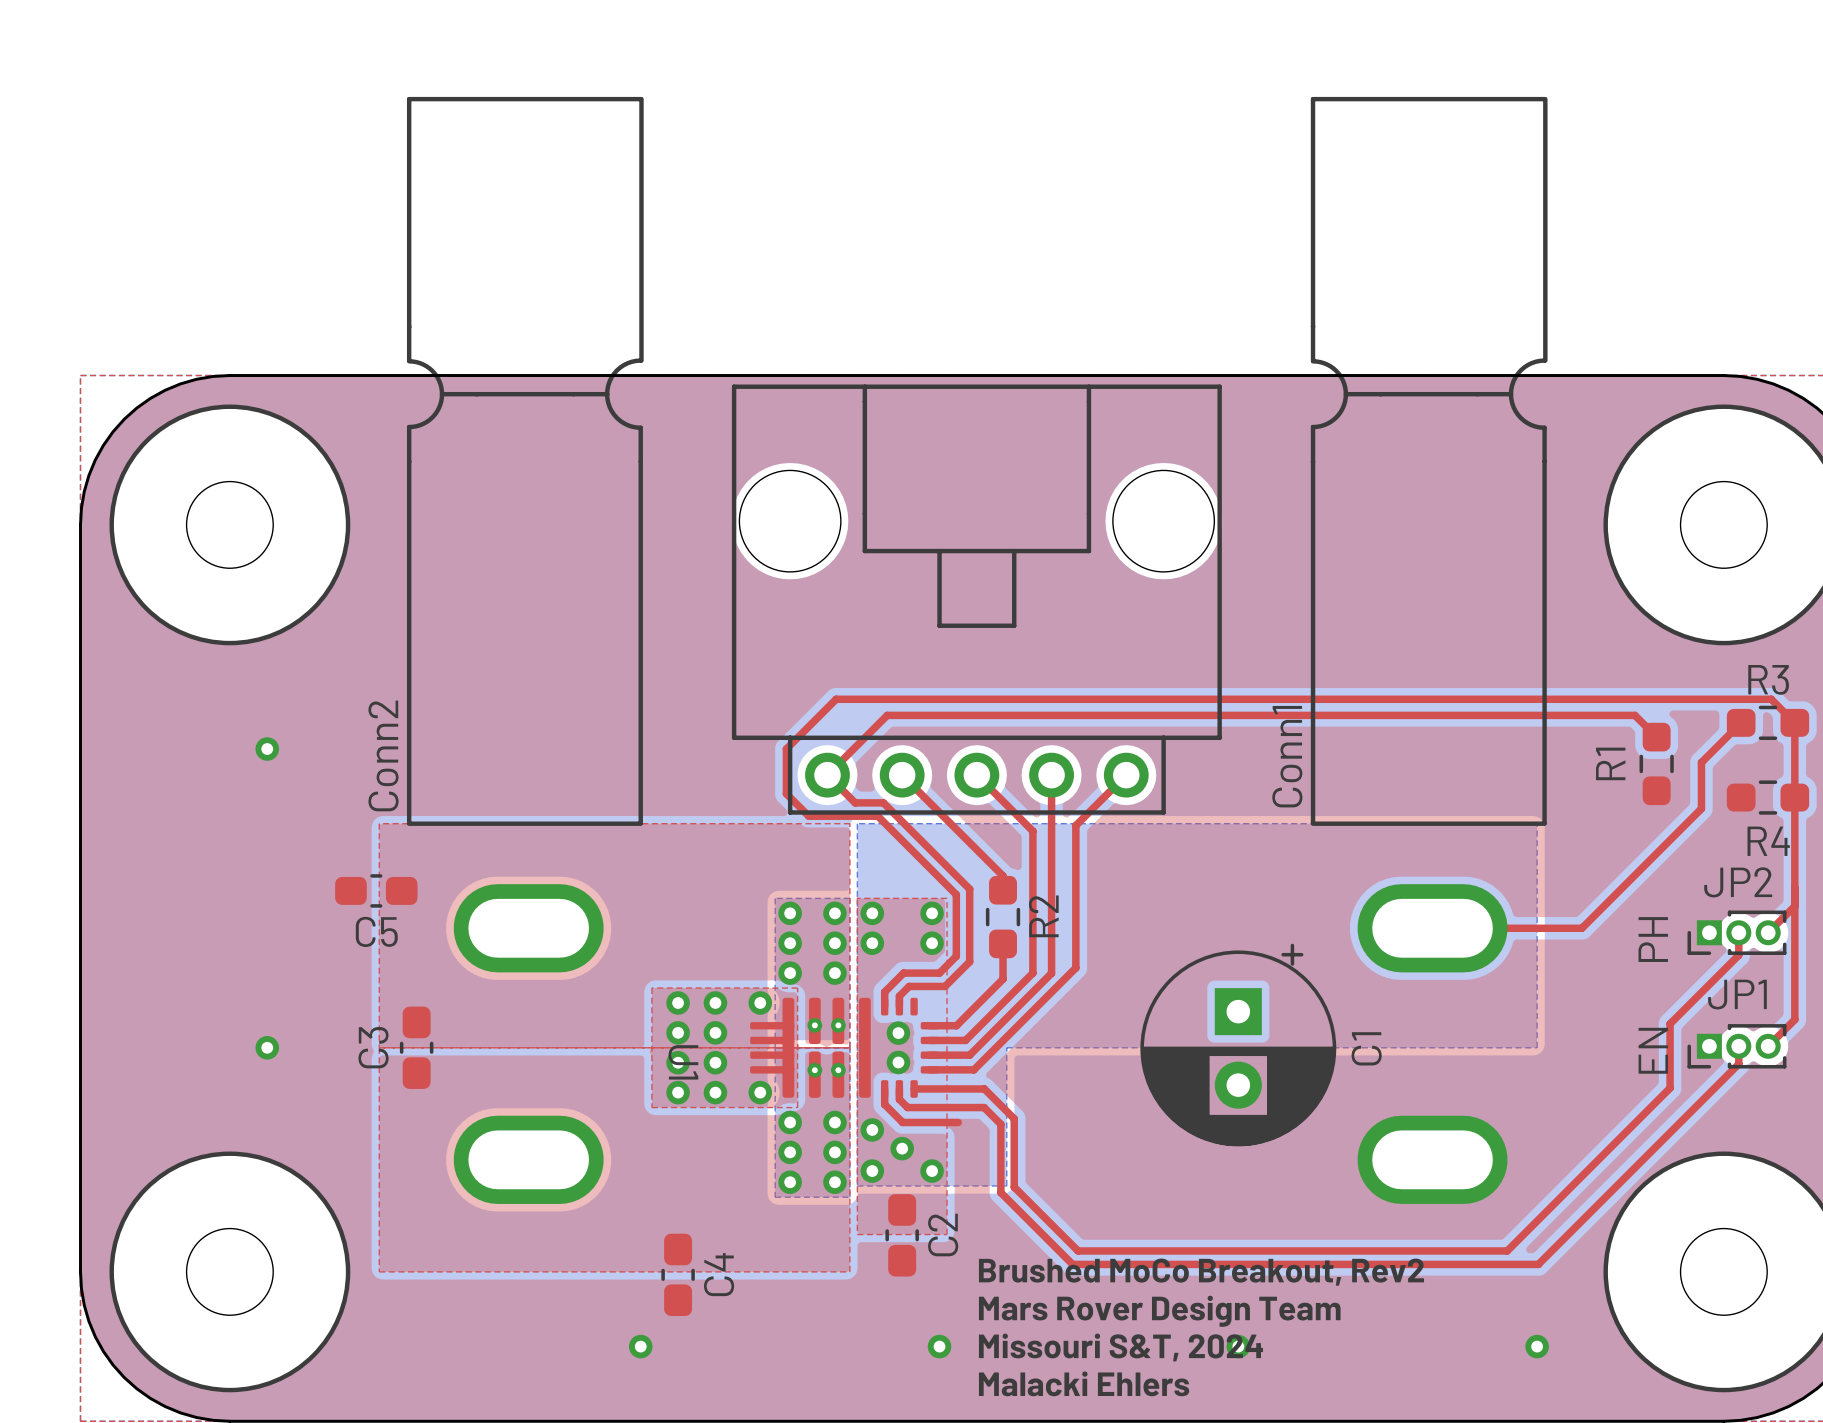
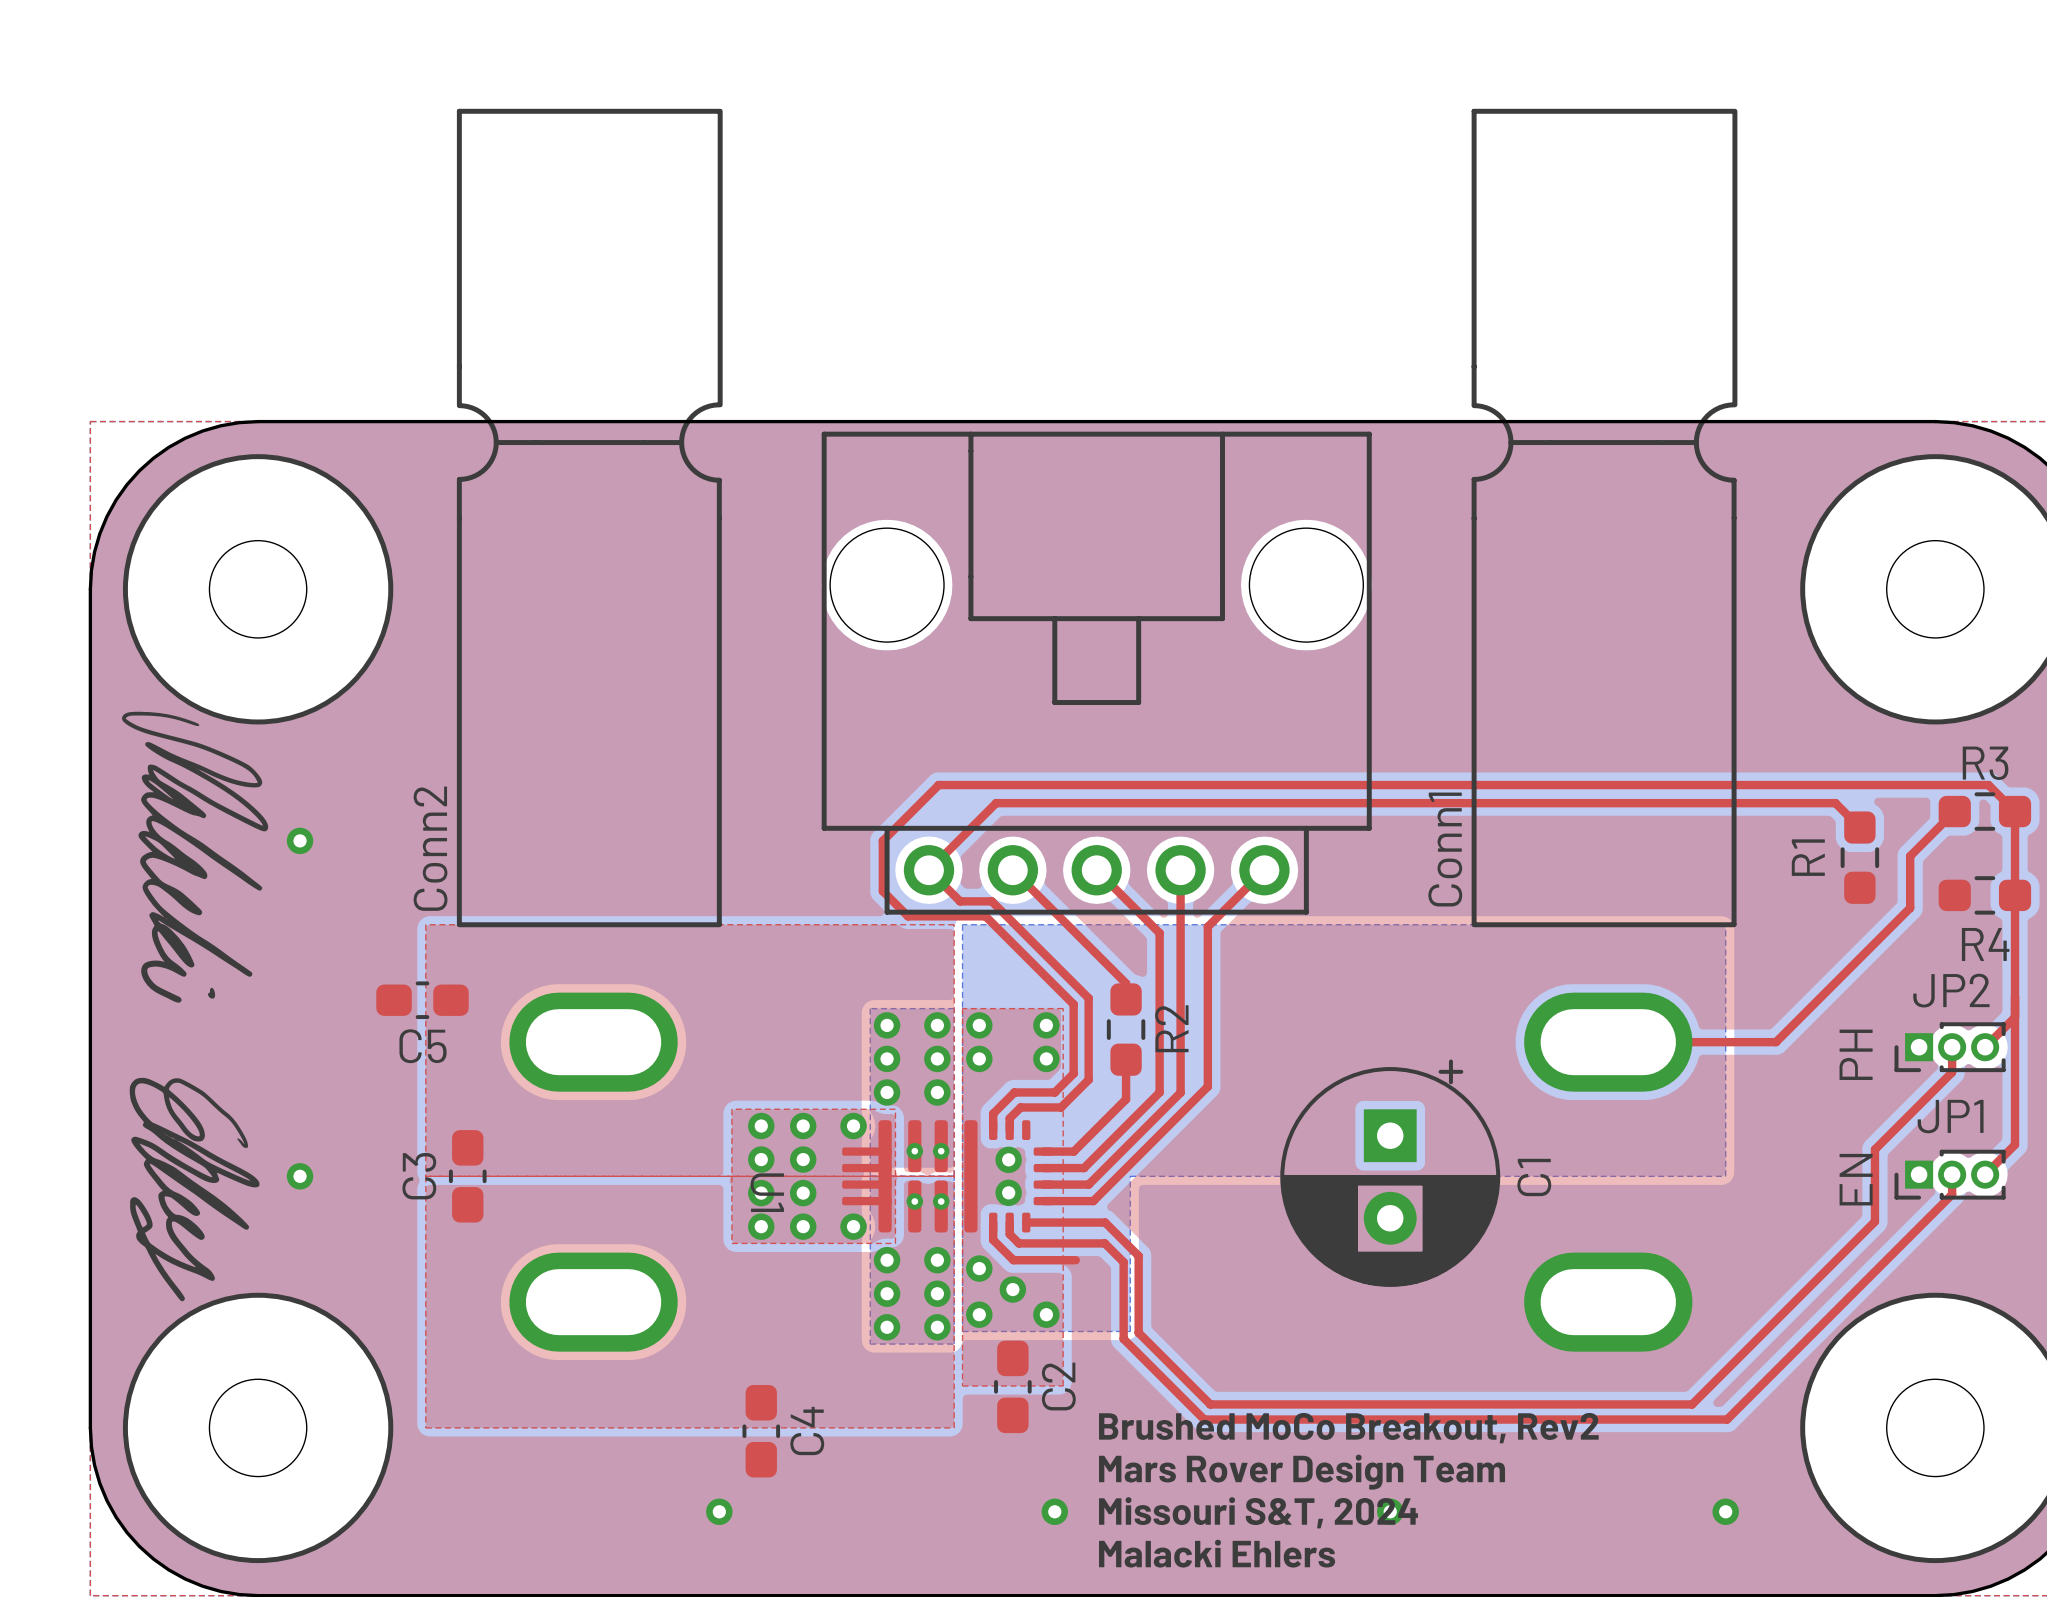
drawing: none -> [121, 711, 269, 1302]

